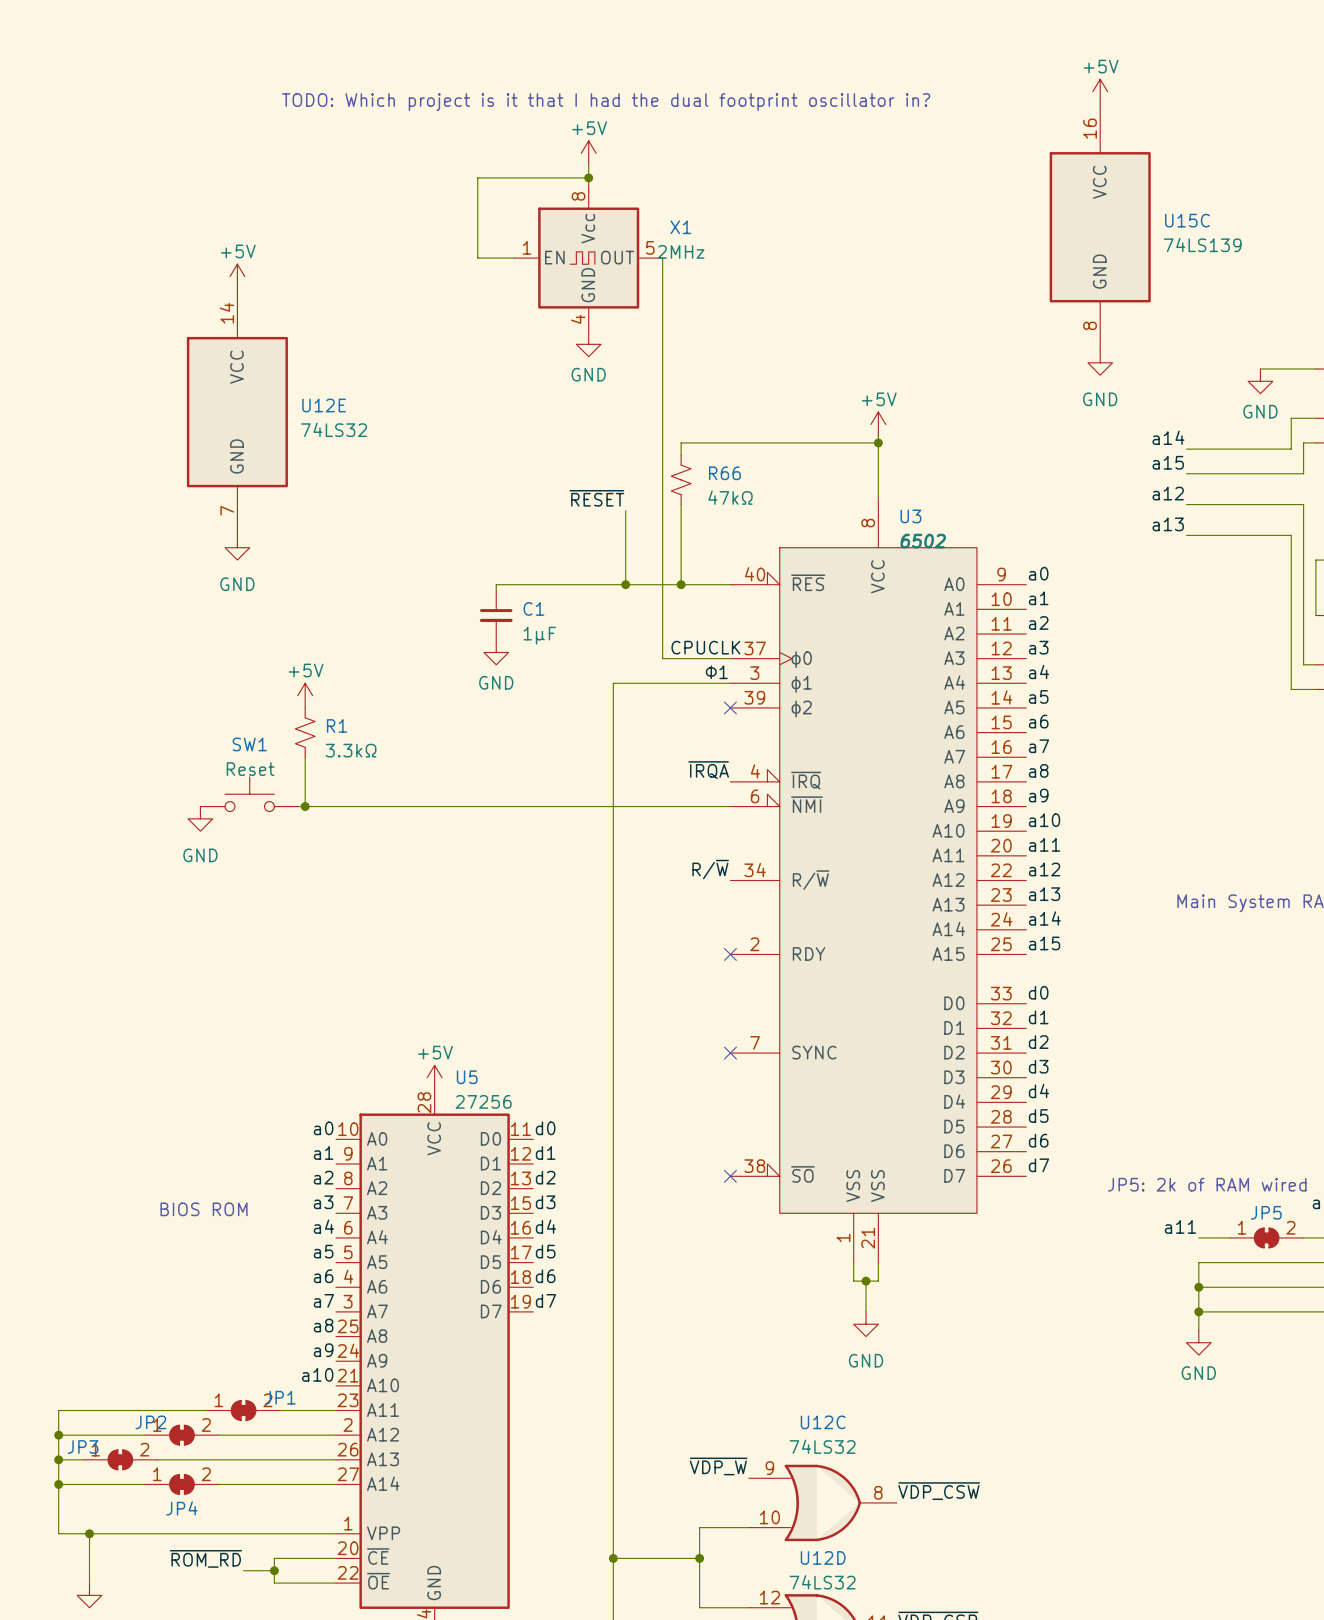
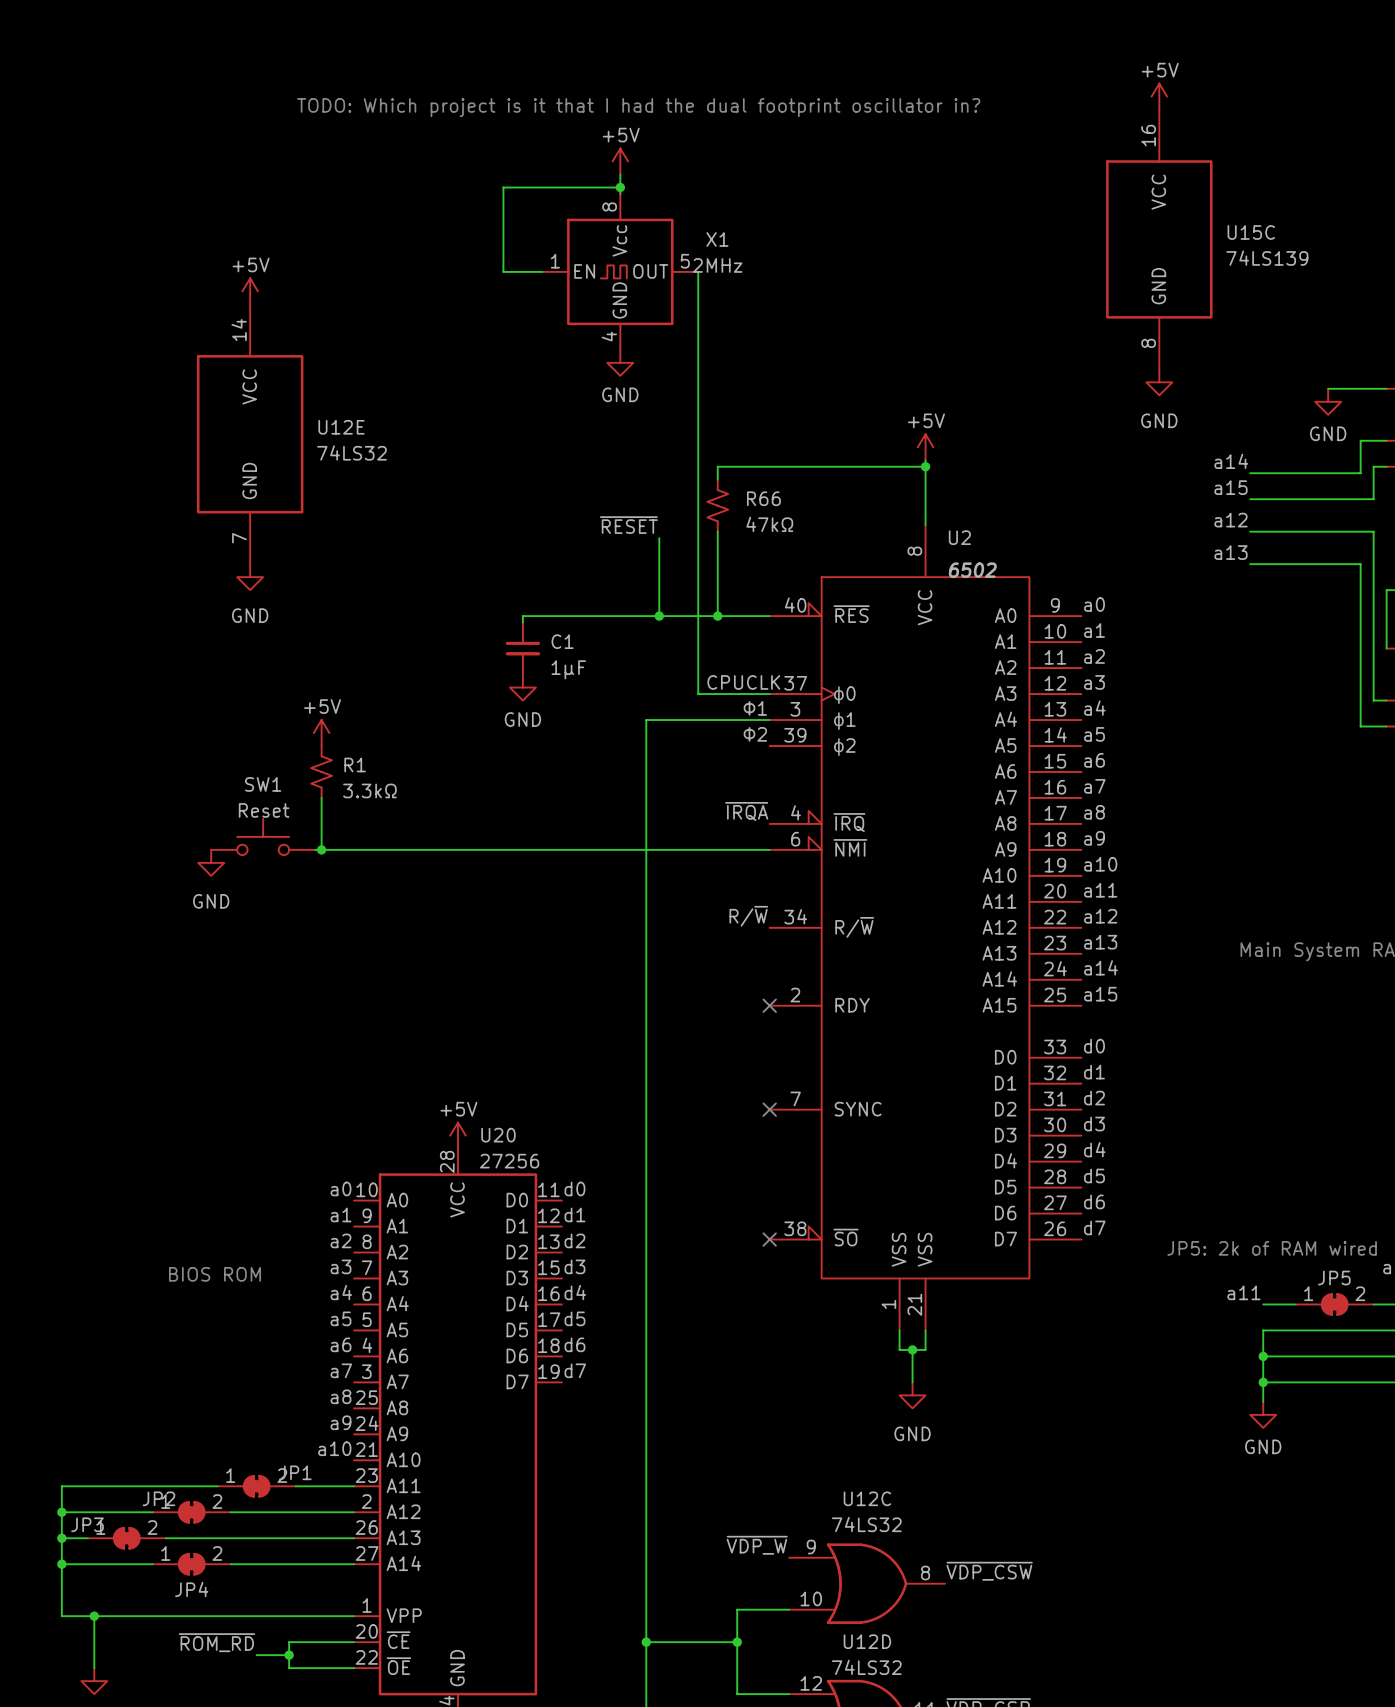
U3 name: U3 (910, 516) -> U2 (959, 537)
label: none -> Φ2 (755, 734)
no-connect mark: (730, 707) -> none
U5 name: U5 (467, 1077) -> U20 (498, 1135)

